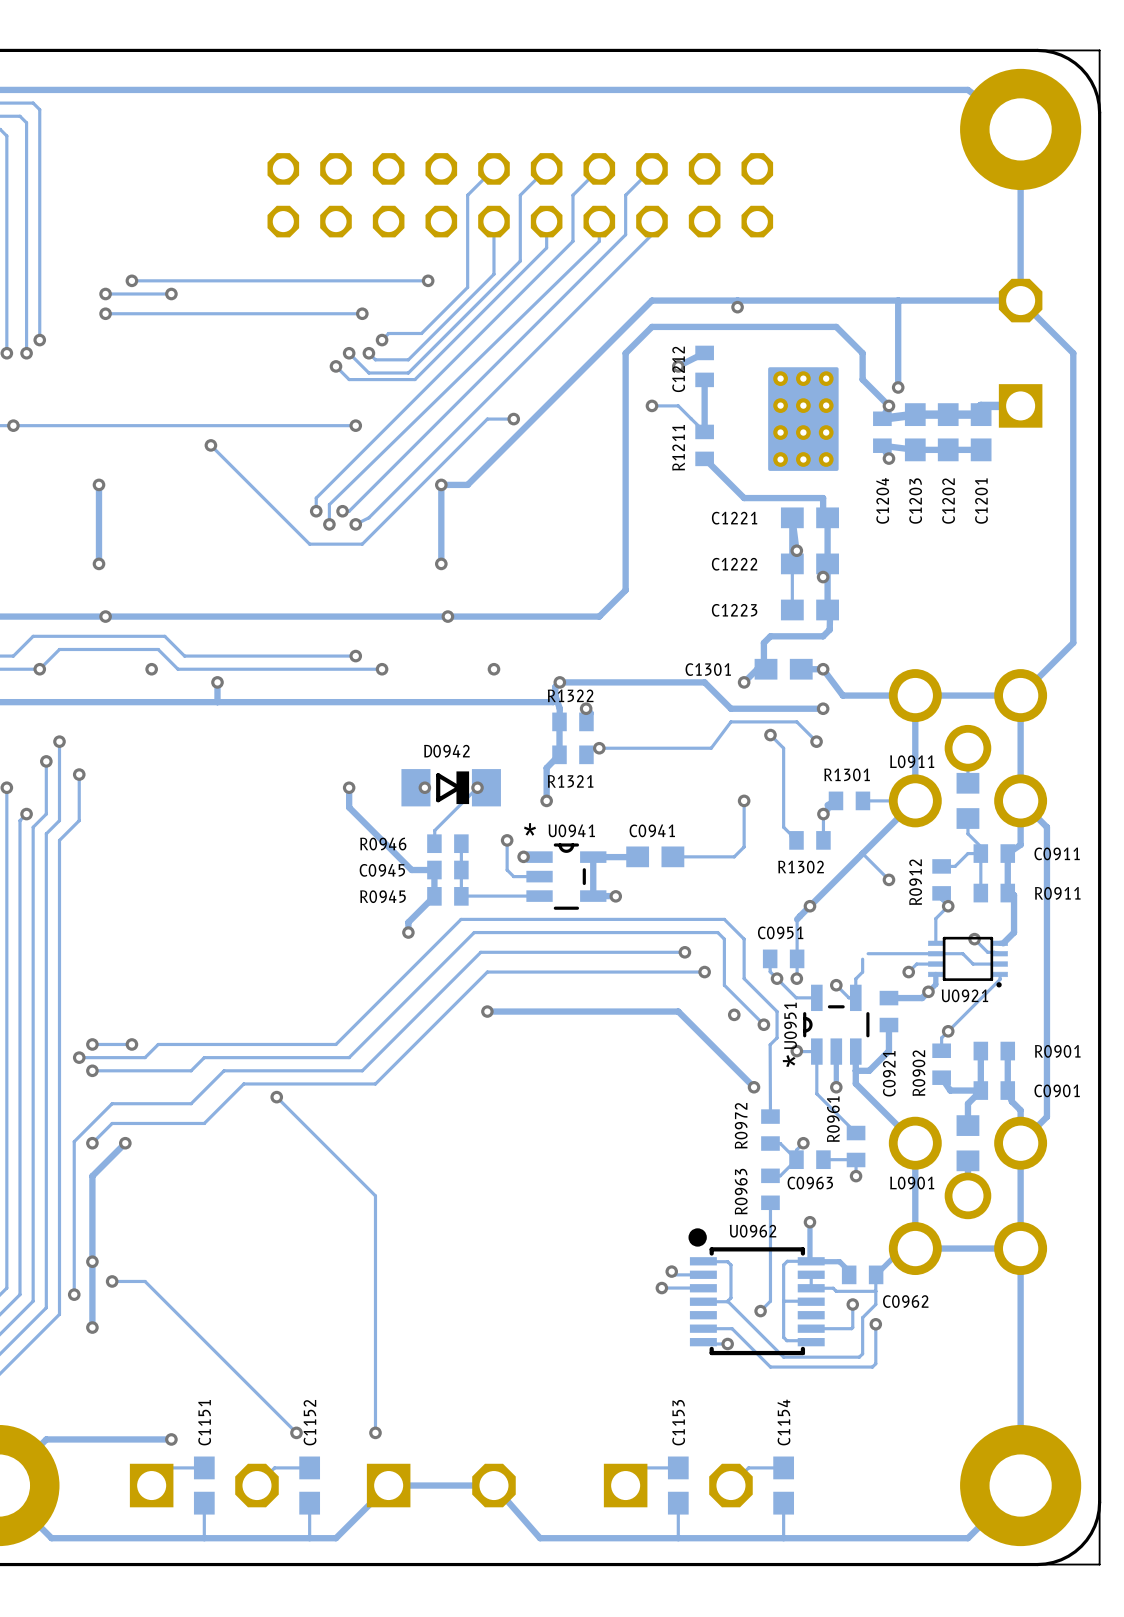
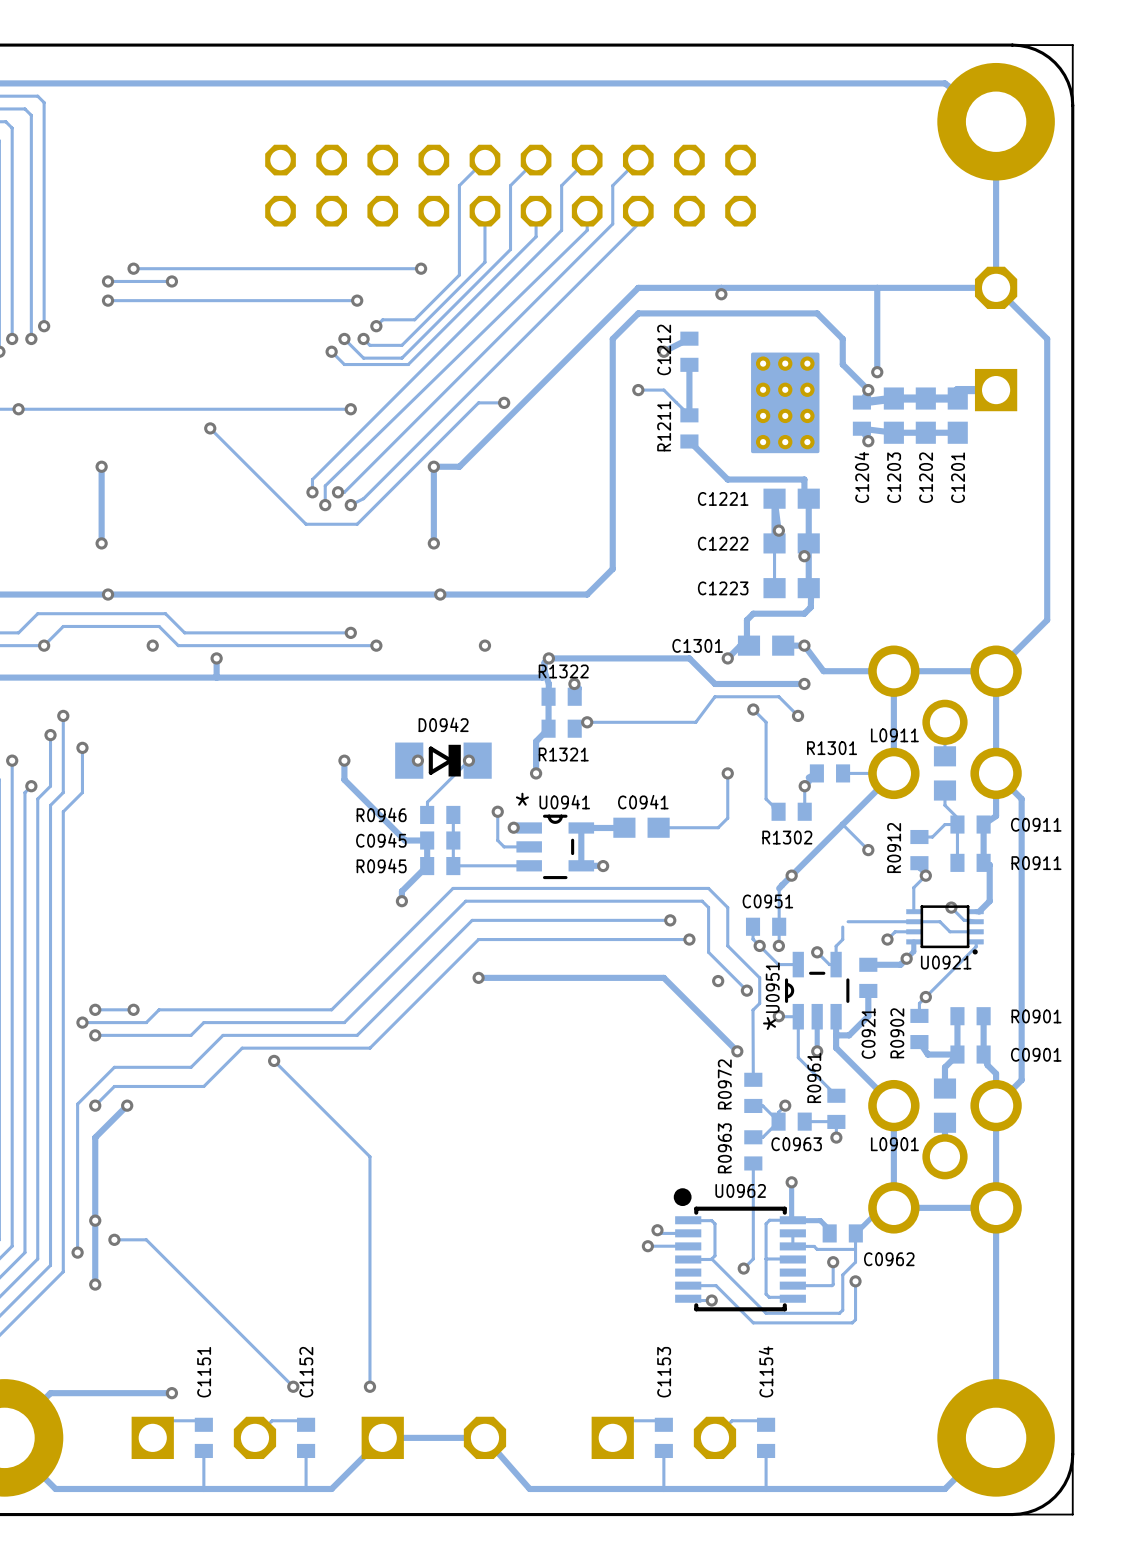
C1151 footprint: [193, 1456, 215, 1515] -> [194, 1417, 213, 1459]
C1152 footprint: [299, 1456, 321, 1515] -> [297, 1417, 316, 1459]
C1153 footprint: [667, 1456, 689, 1515] -> [654, 1417, 673, 1459]
C1154 footprint: [773, 1456, 795, 1515] -> [757, 1417, 776, 1459]

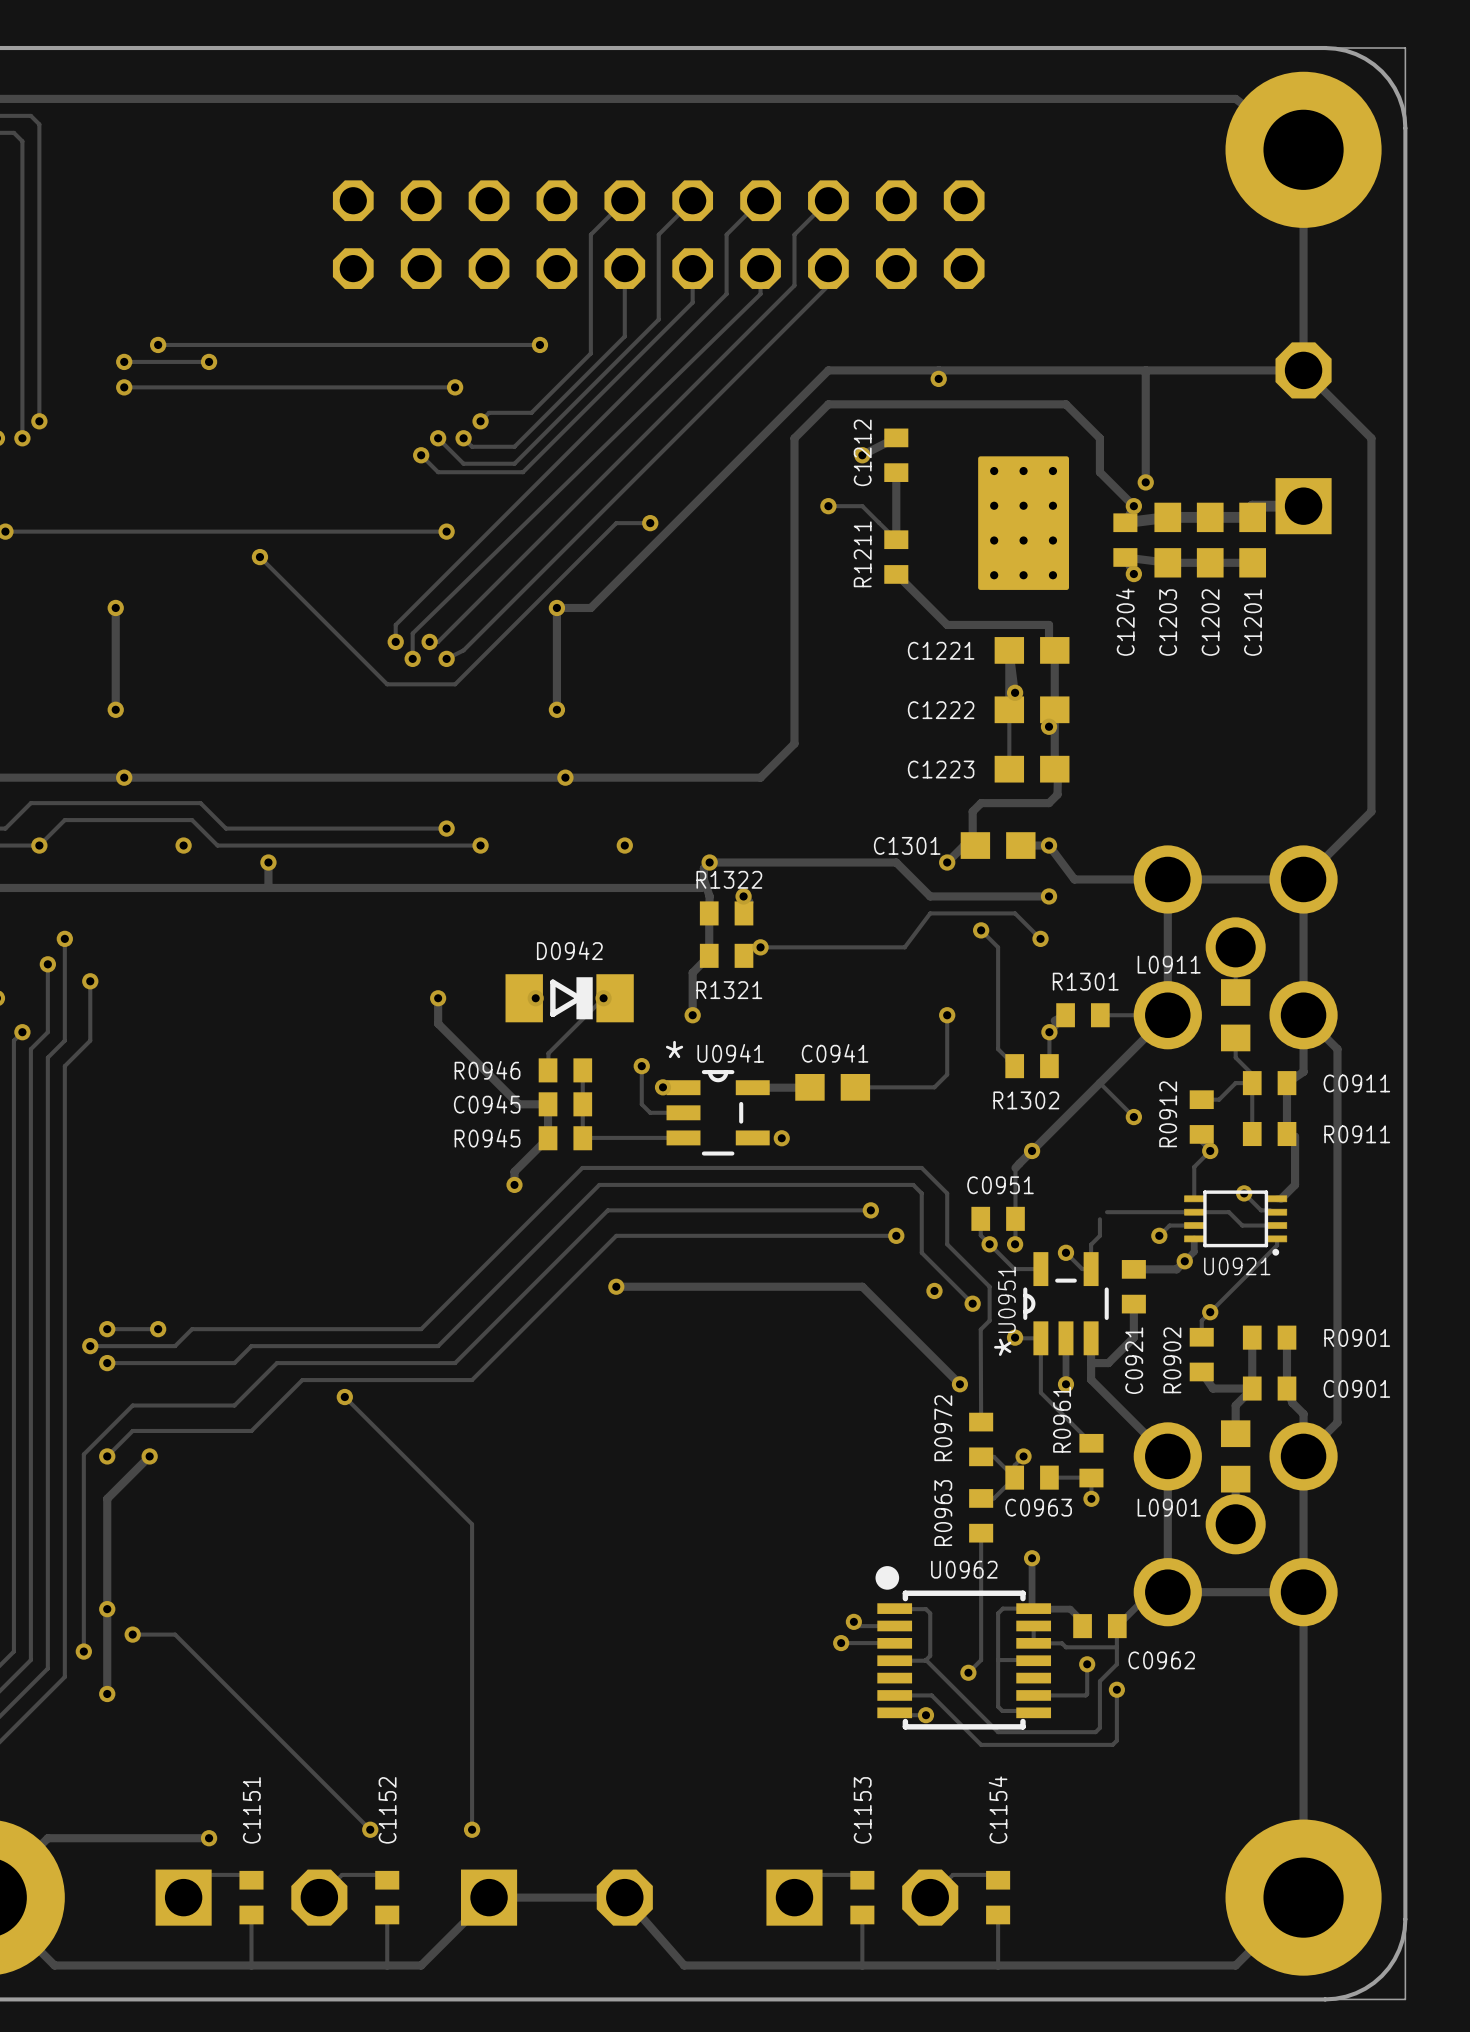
track: (581, 827) (581, 865) (602, 865) -> none

